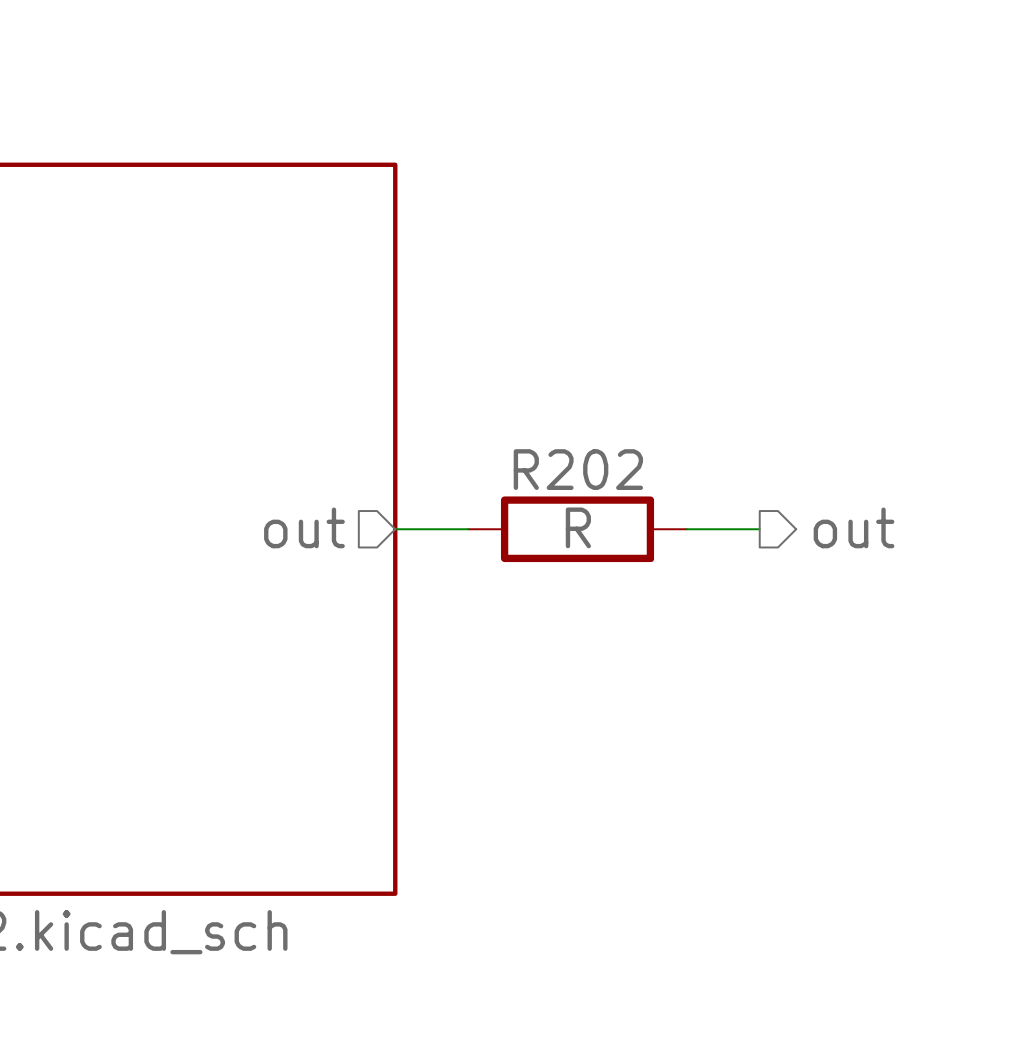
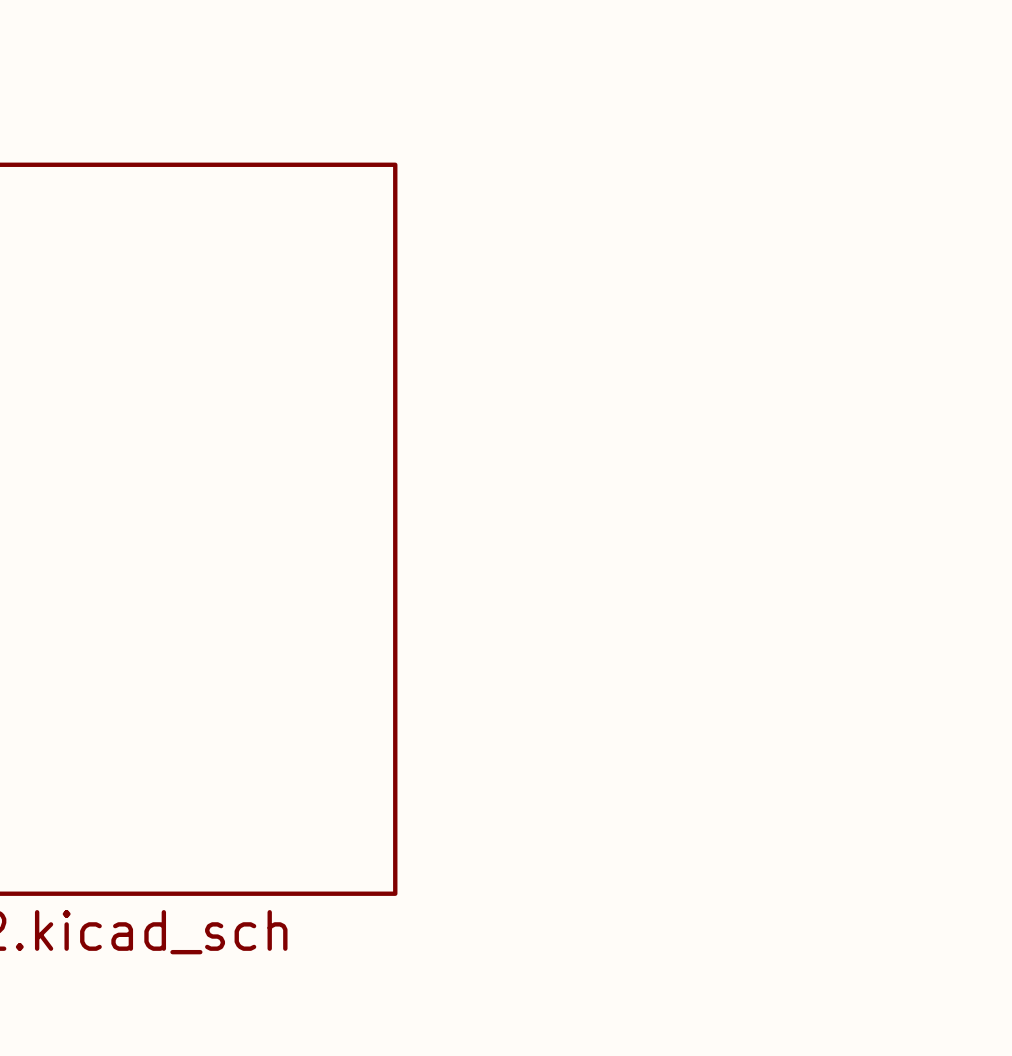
sheet pin: out (304, 527) -> none
hierarchical label: out (854, 527) -> none
wire: (395, 529) (468, 529) -> none
R202: R (577, 529) -> none
wire: (686, 529) (759, 529) -> none

